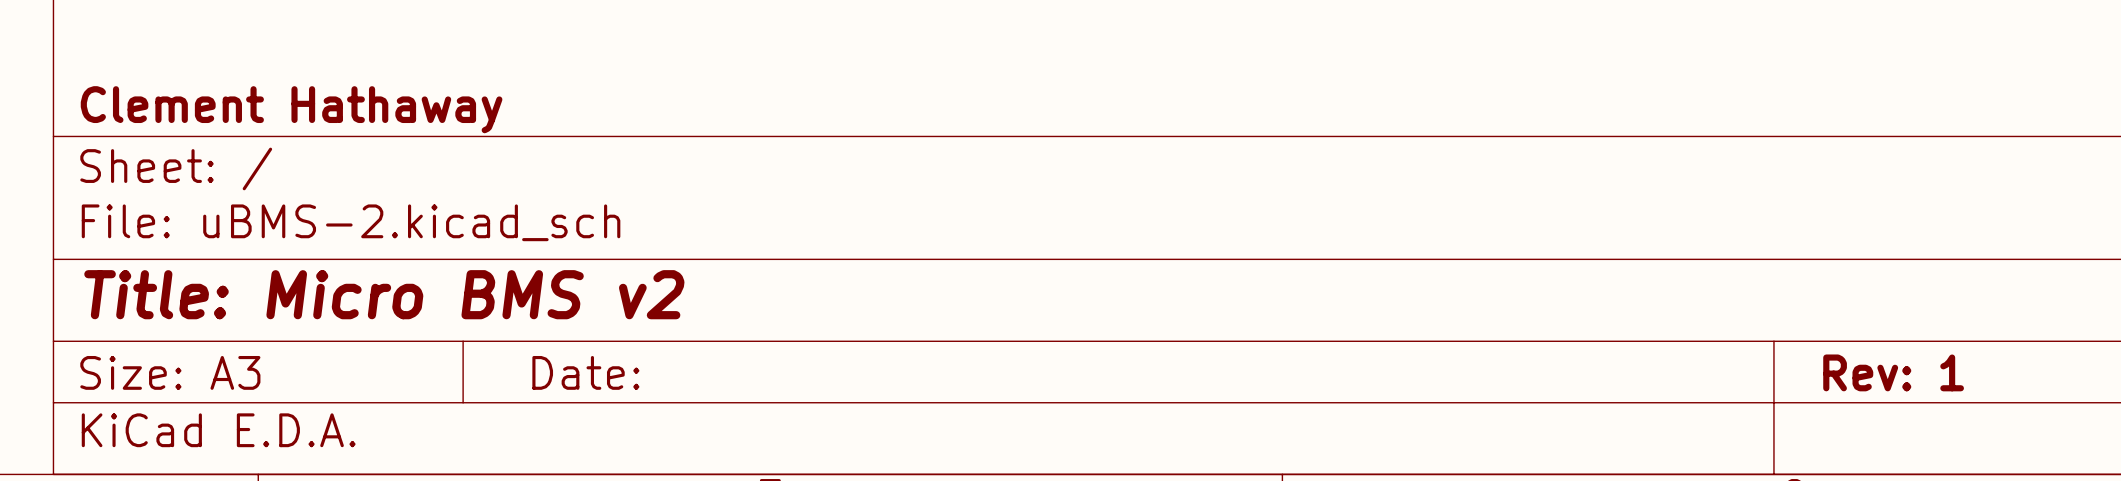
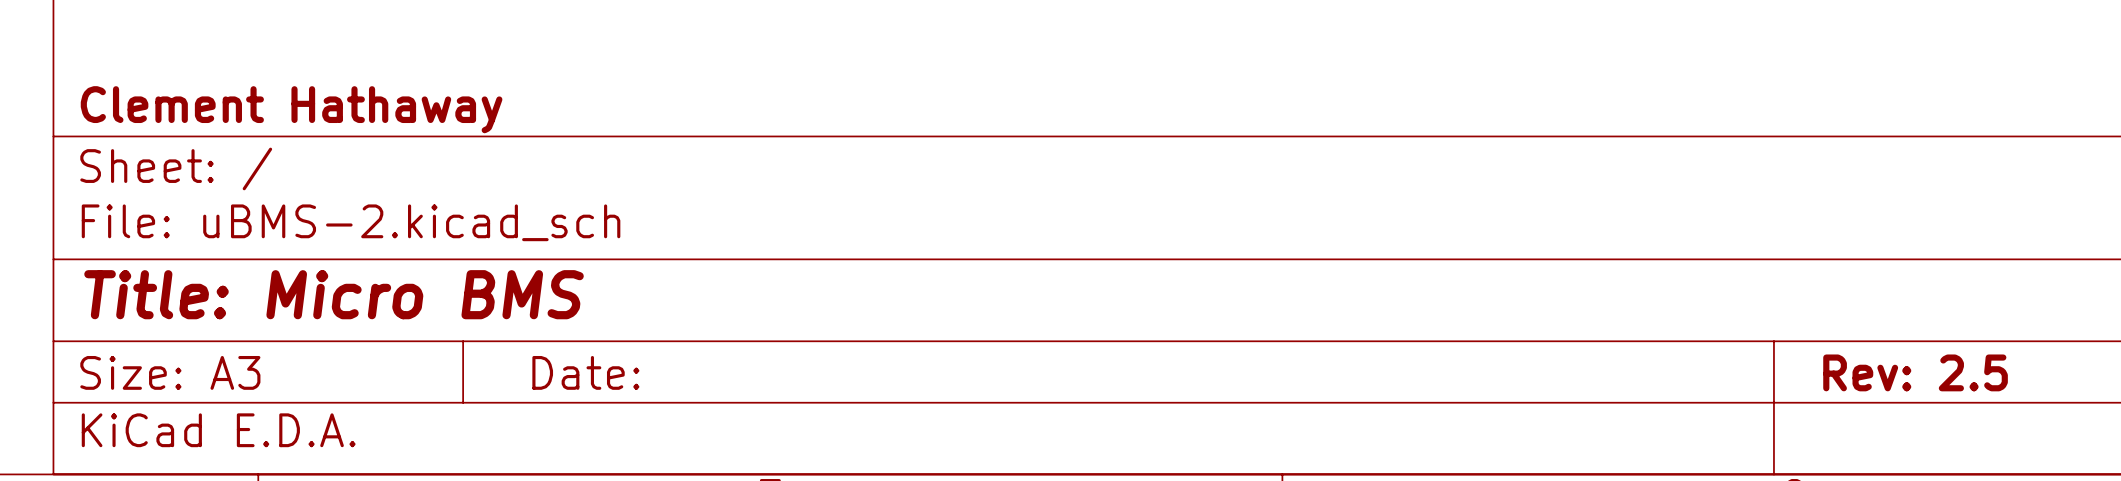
title block: Title: Micro BMS v2 (384, 294) -> Title: Micro BMS (334, 294)
title block: Rev: 1 (1893, 372) -> Rev: 2.5 (1915, 372)

